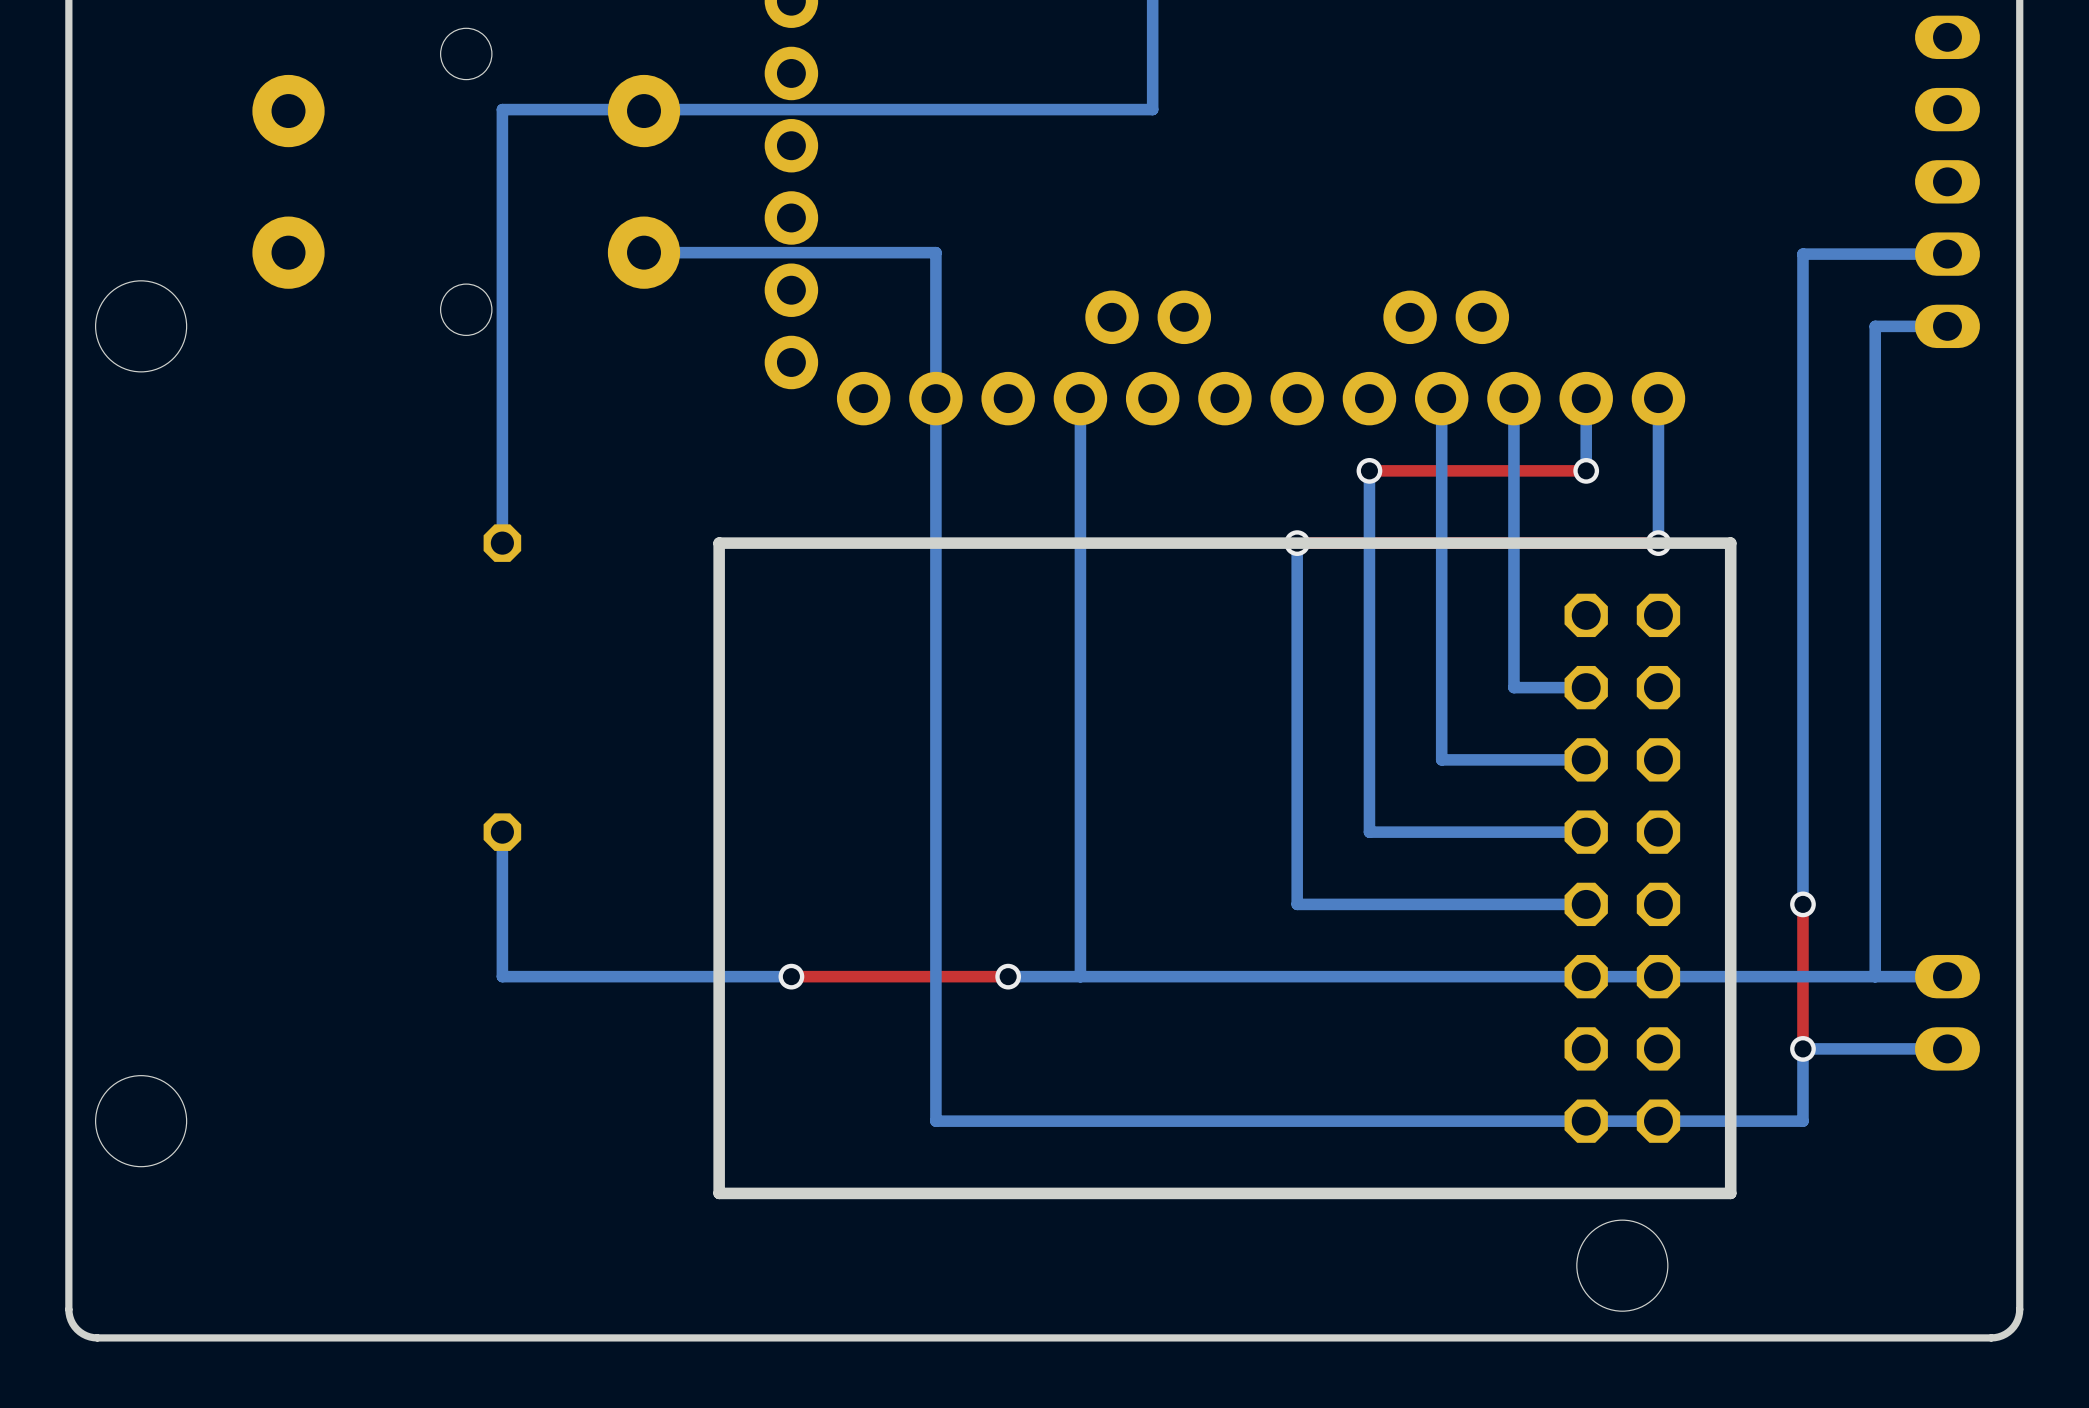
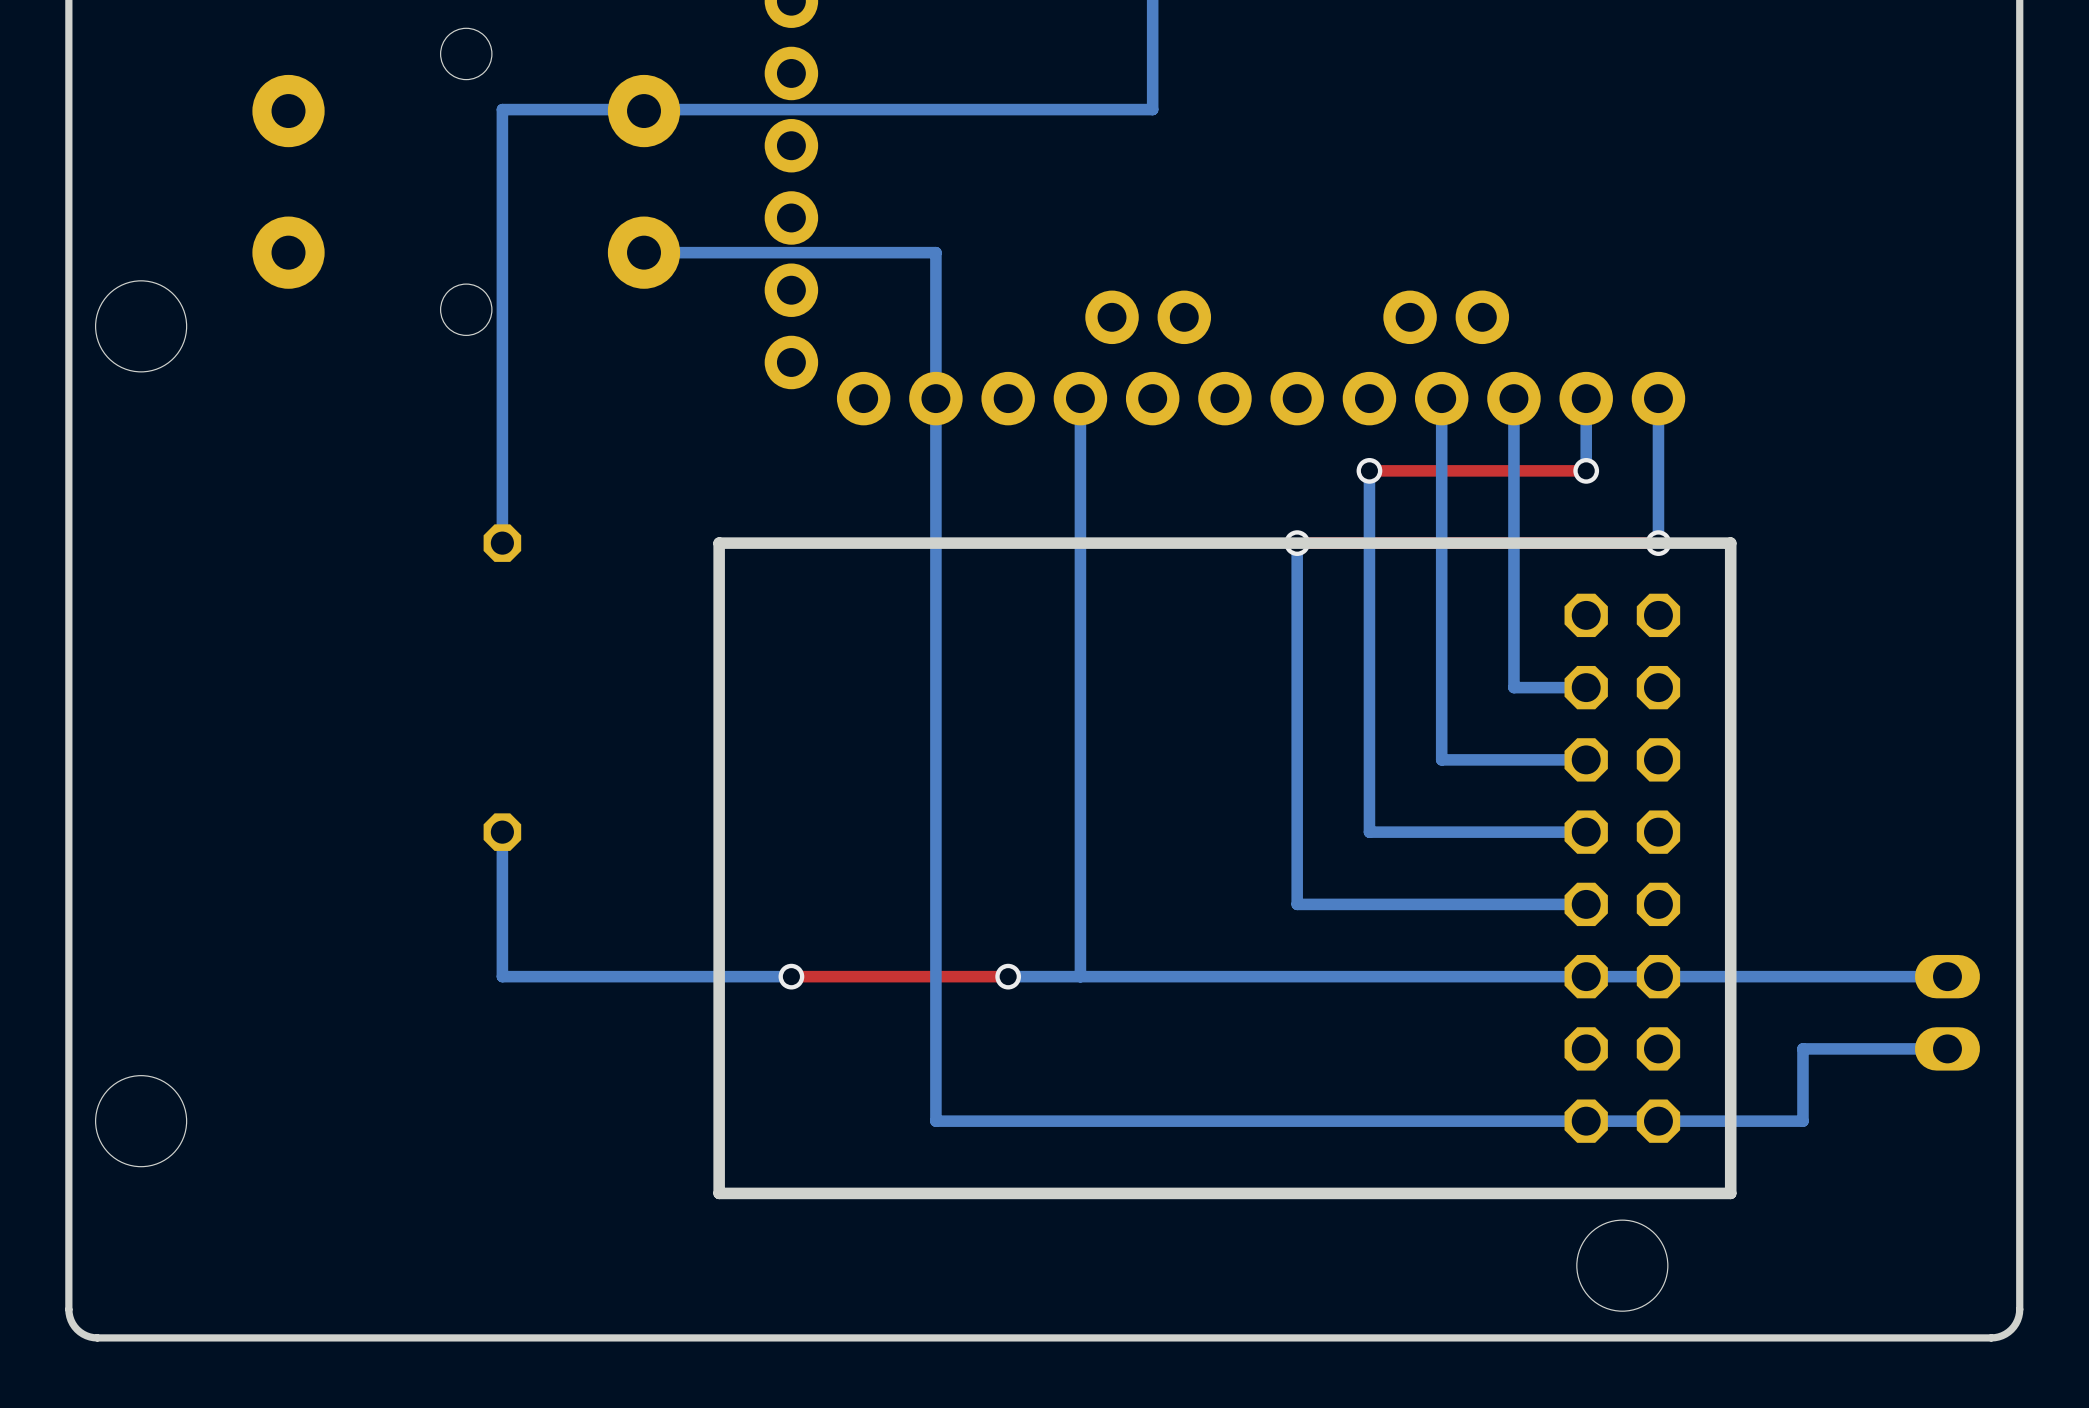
part: (1947, 181) -> none
bottom track: (1947, 254) (1802, 254) (1802, 904) -> none
bottom track: (1947, 326) (1875, 326) (1875, 976) -> none
top track: (1802, 904) (1802, 1048) -> none
via: (1802, 904) -> none
via: (1802, 1048) -> none

